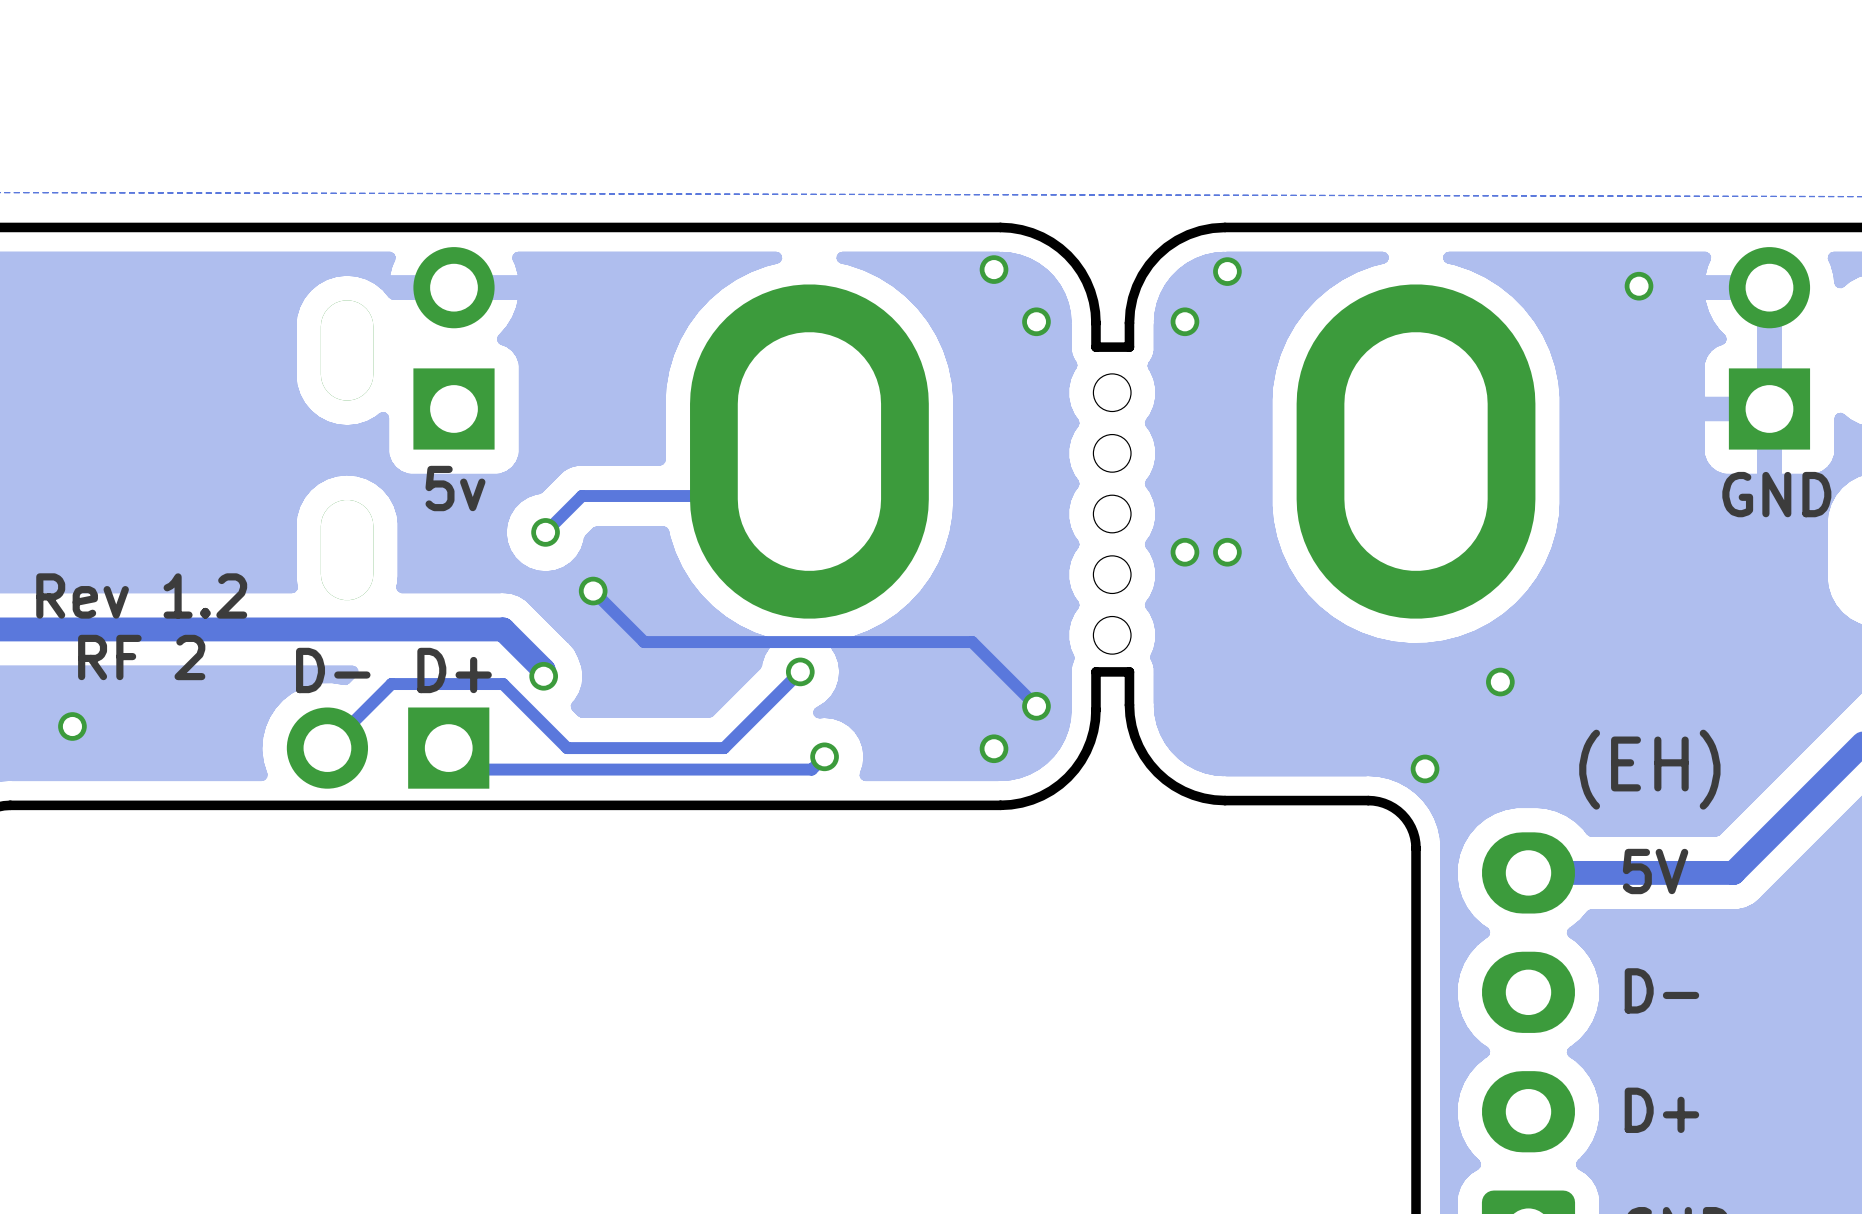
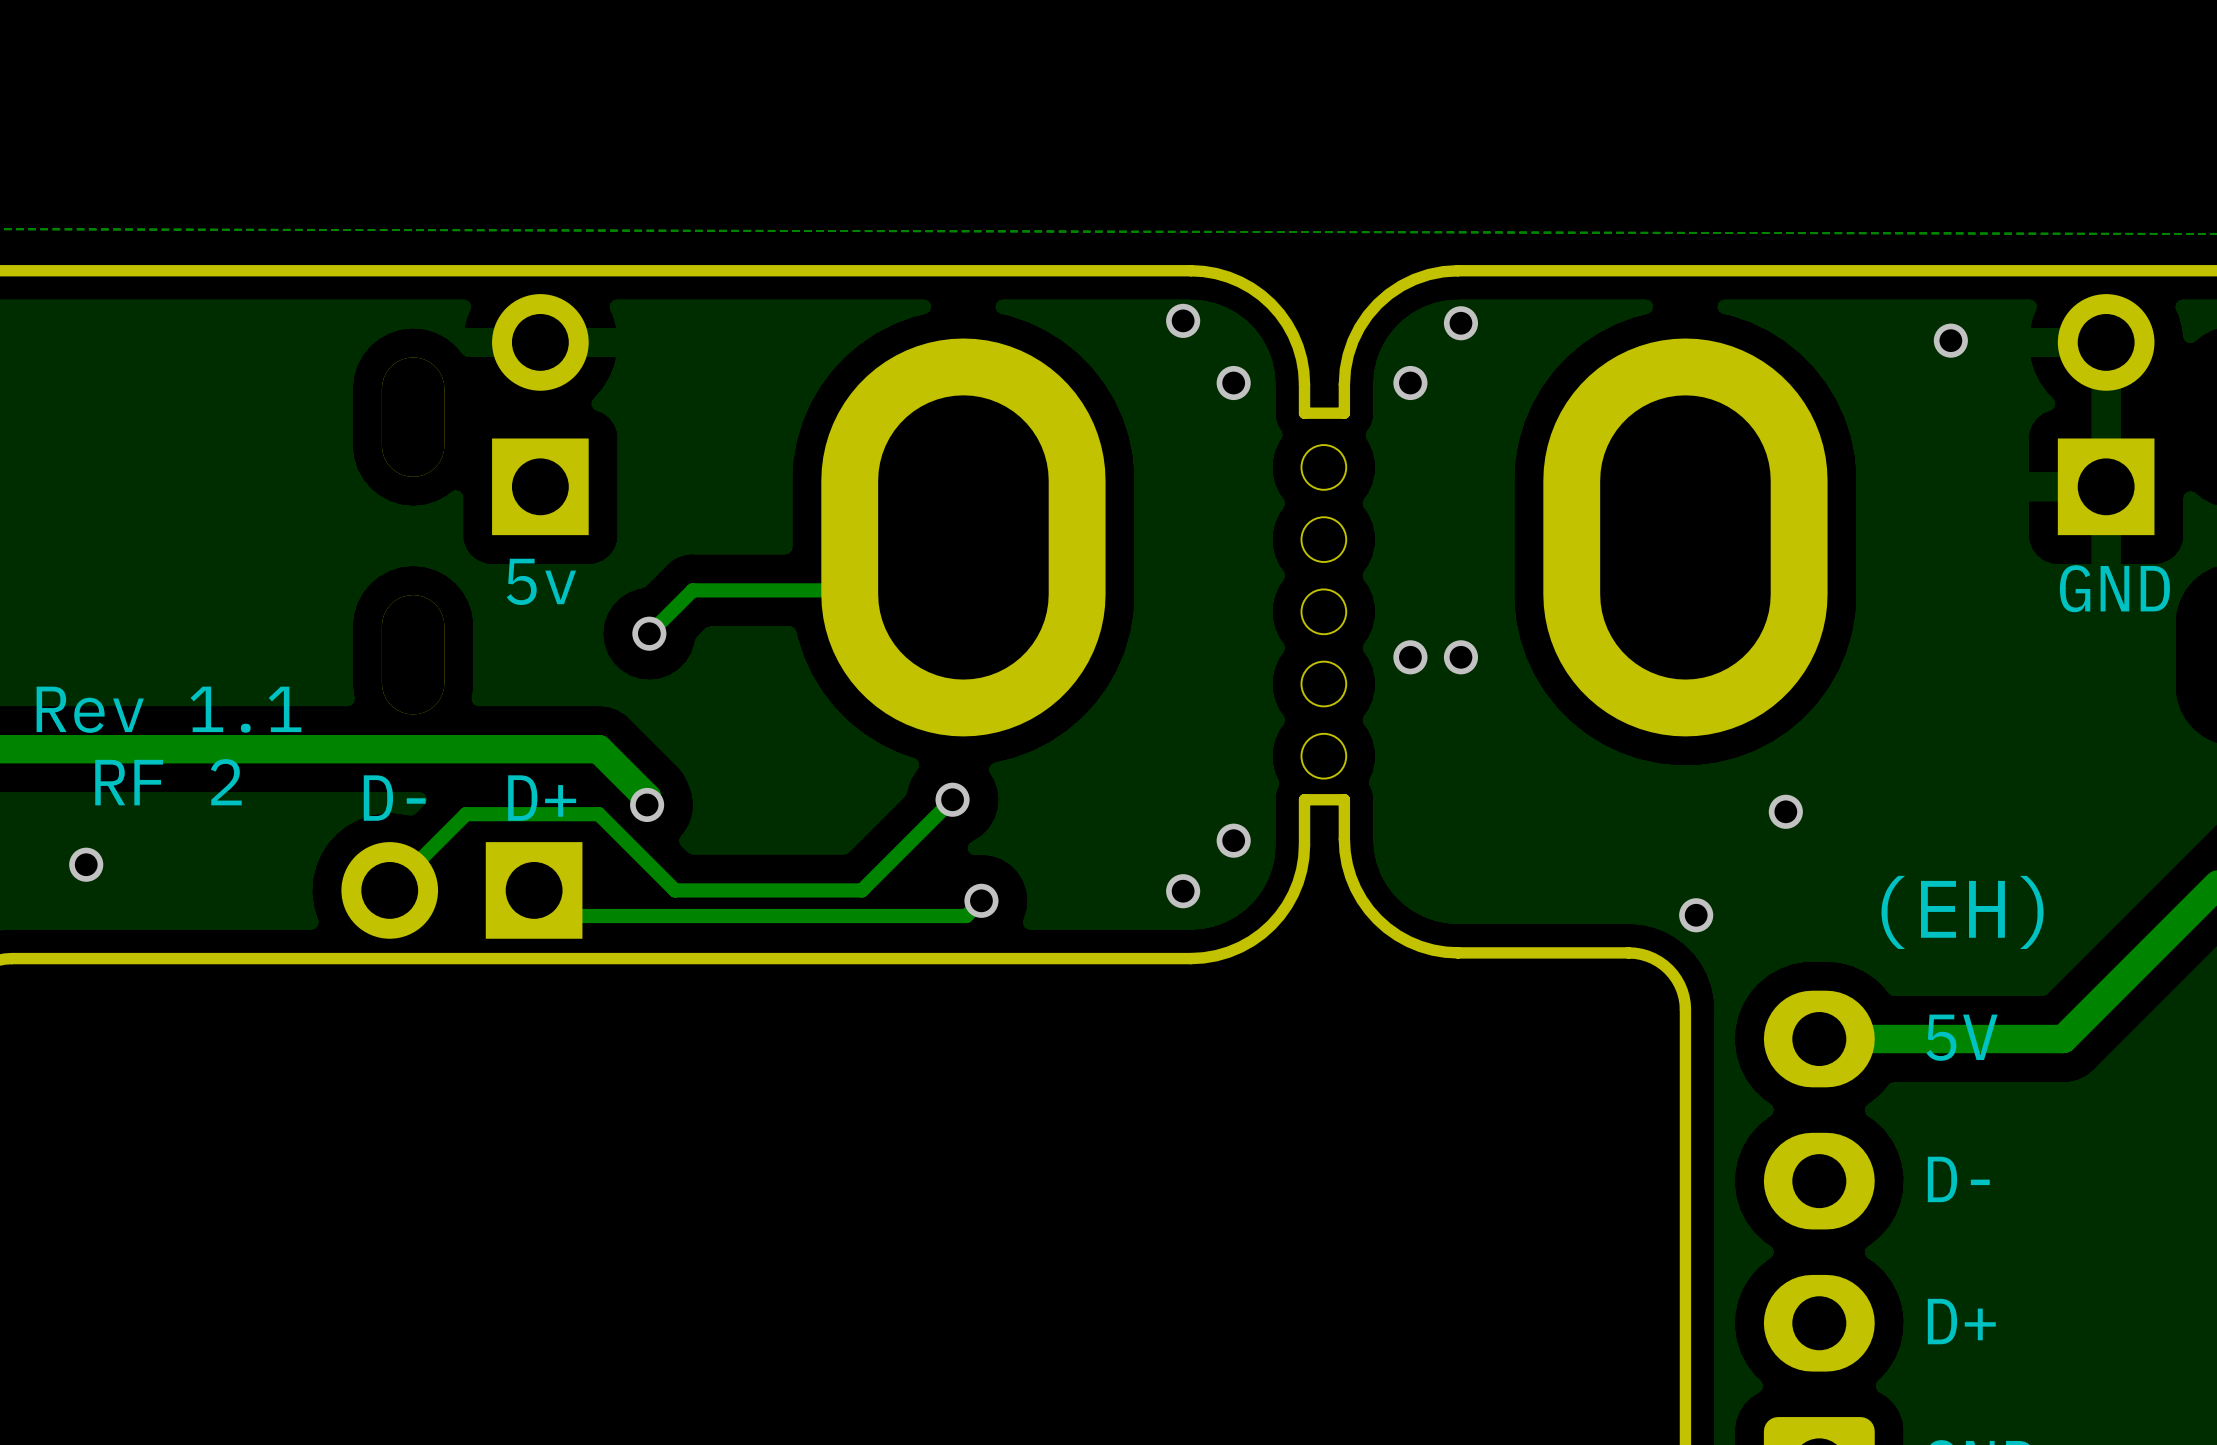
track: (593, 591) (644, 642) (972, 642) (1036, 706) -> none
via: (593, 591) -> none
text: Rev 1.2 (141, 595) -> Rev 1.1 (168, 709)

